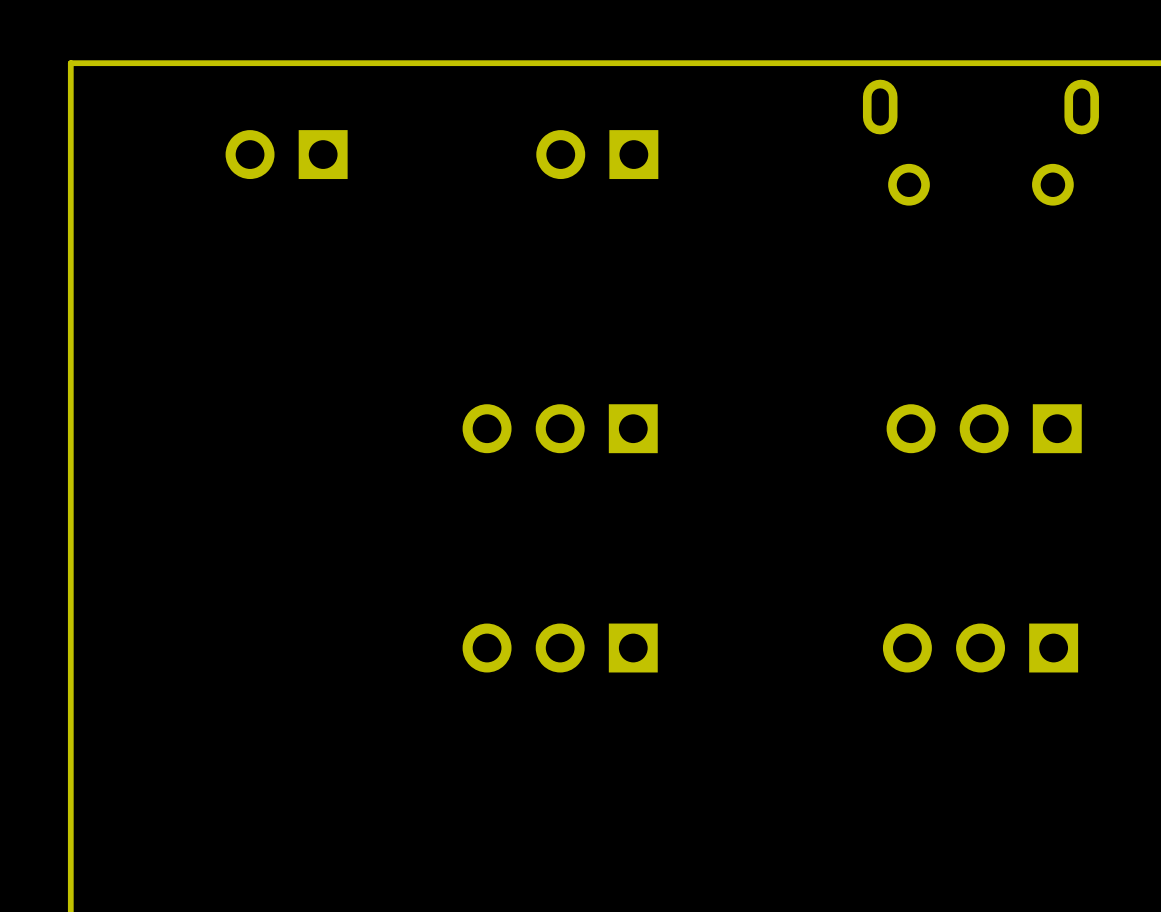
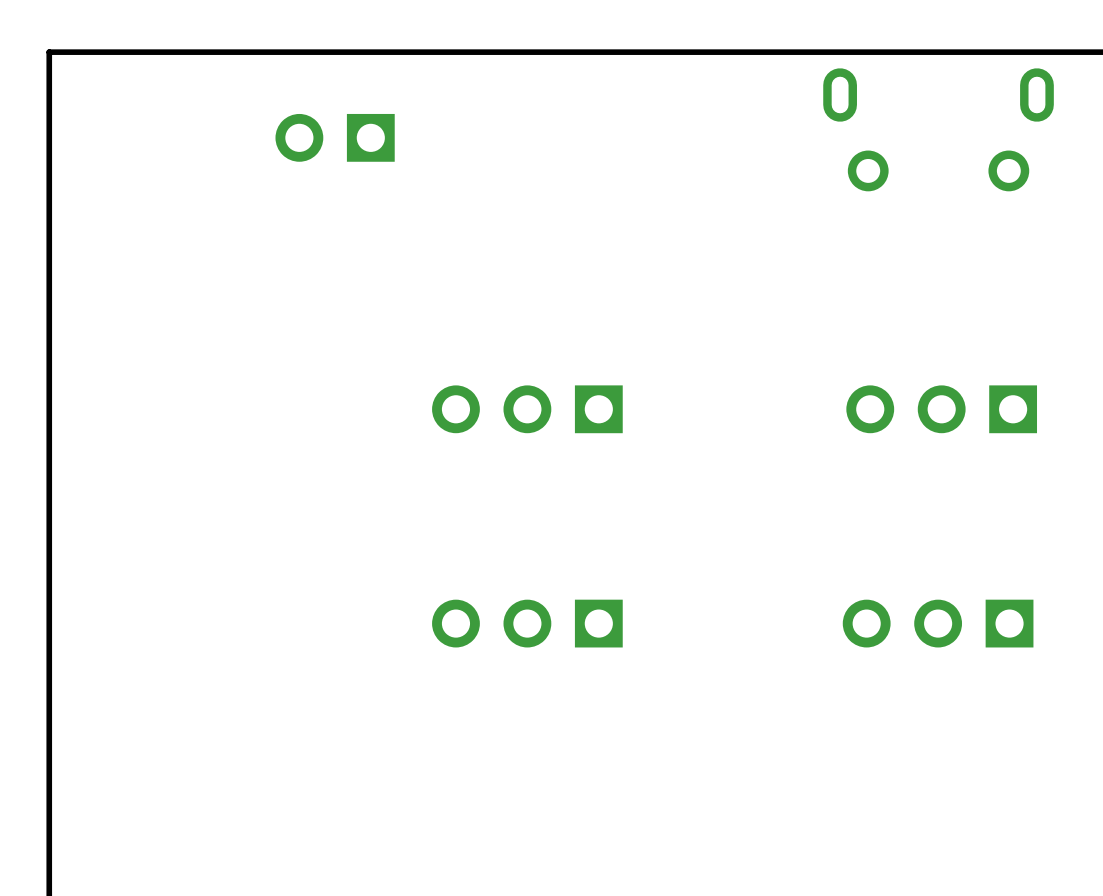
part position: (286, 154) -> (335, 137)
part: (597, 154) -> none

